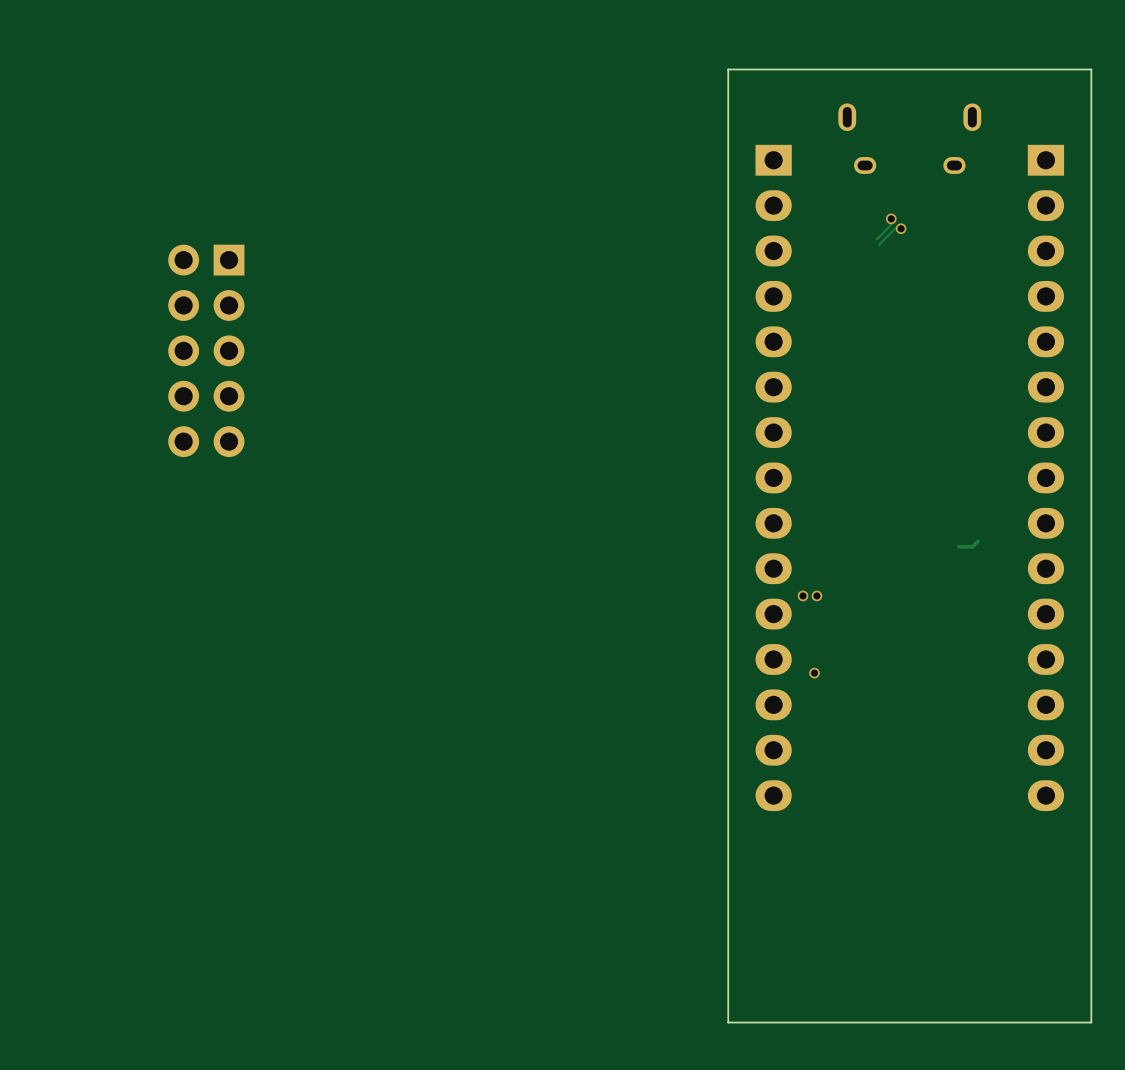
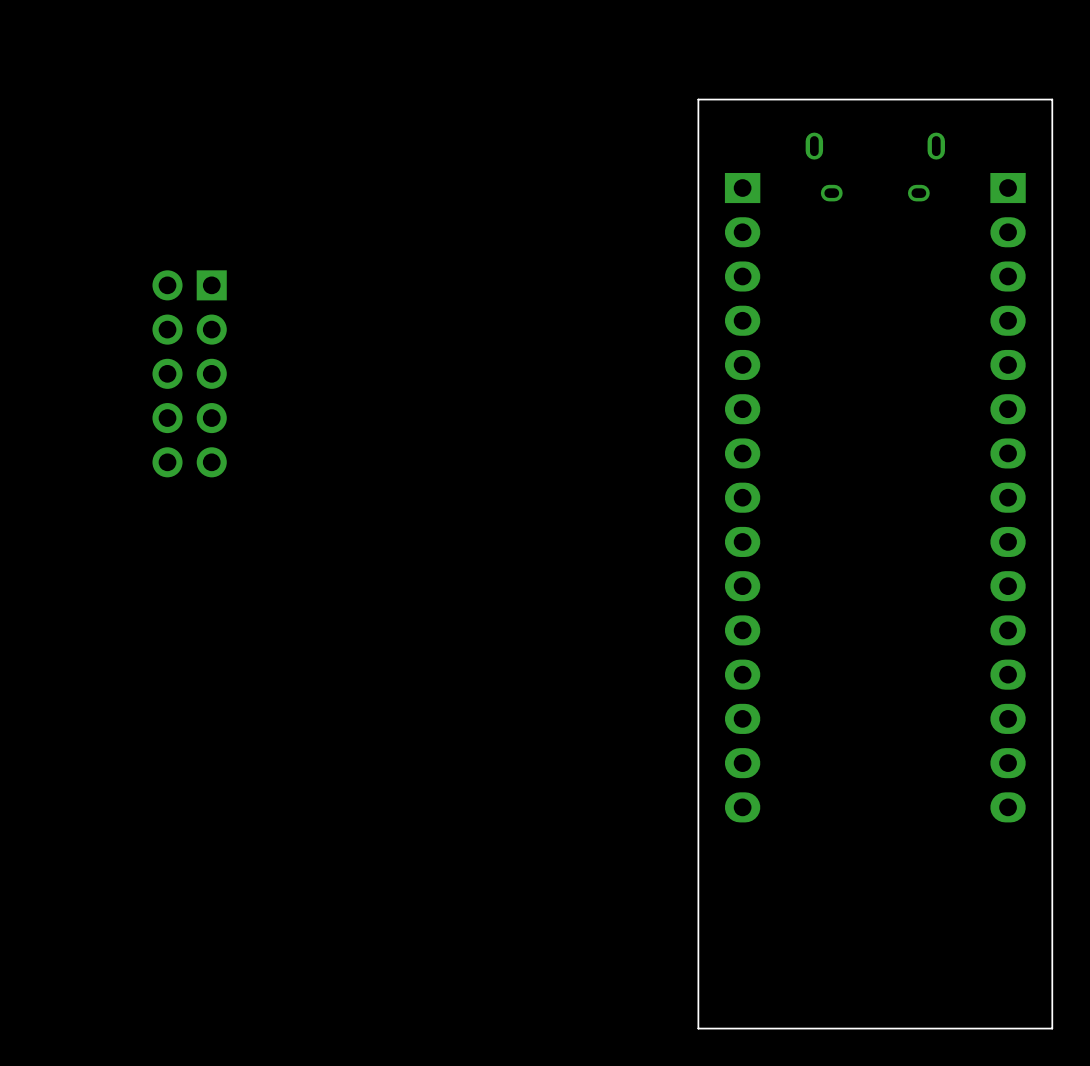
track: (891, 218) (891, 224) (876, 239) -> none
via: (891, 218) -> none
track: (901, 228) (895, 228) (879, 244) -> none
via: (901, 228) -> none
track: (977, 541) (972, 546) (958, 546) -> none
via: (802, 595) -> none
via: (816, 595) -> none
via: (814, 673) -> none

